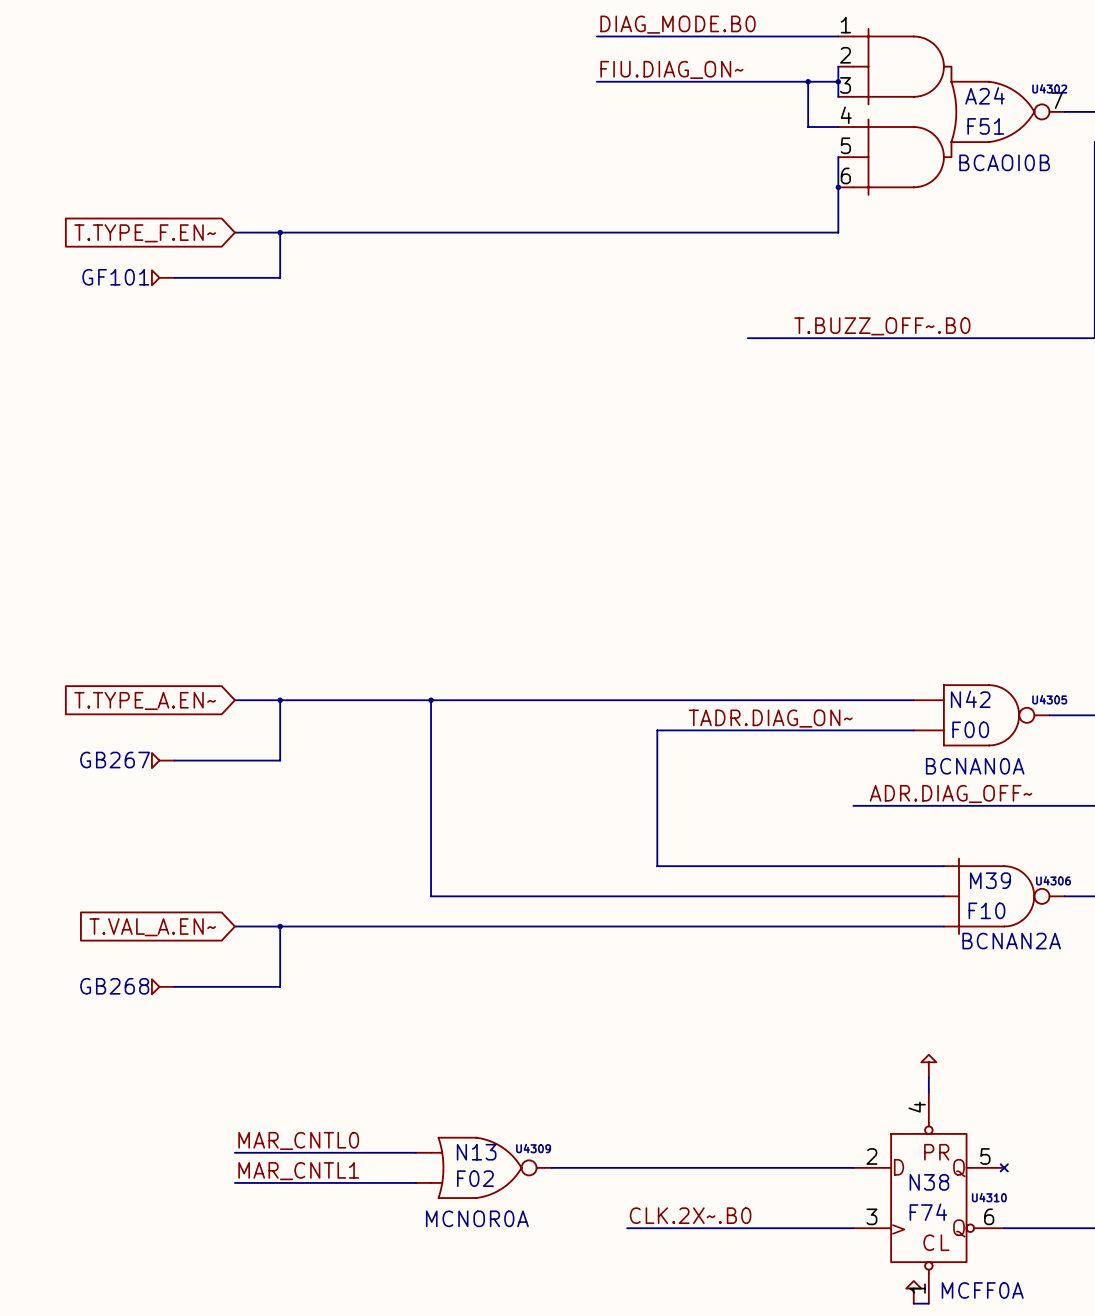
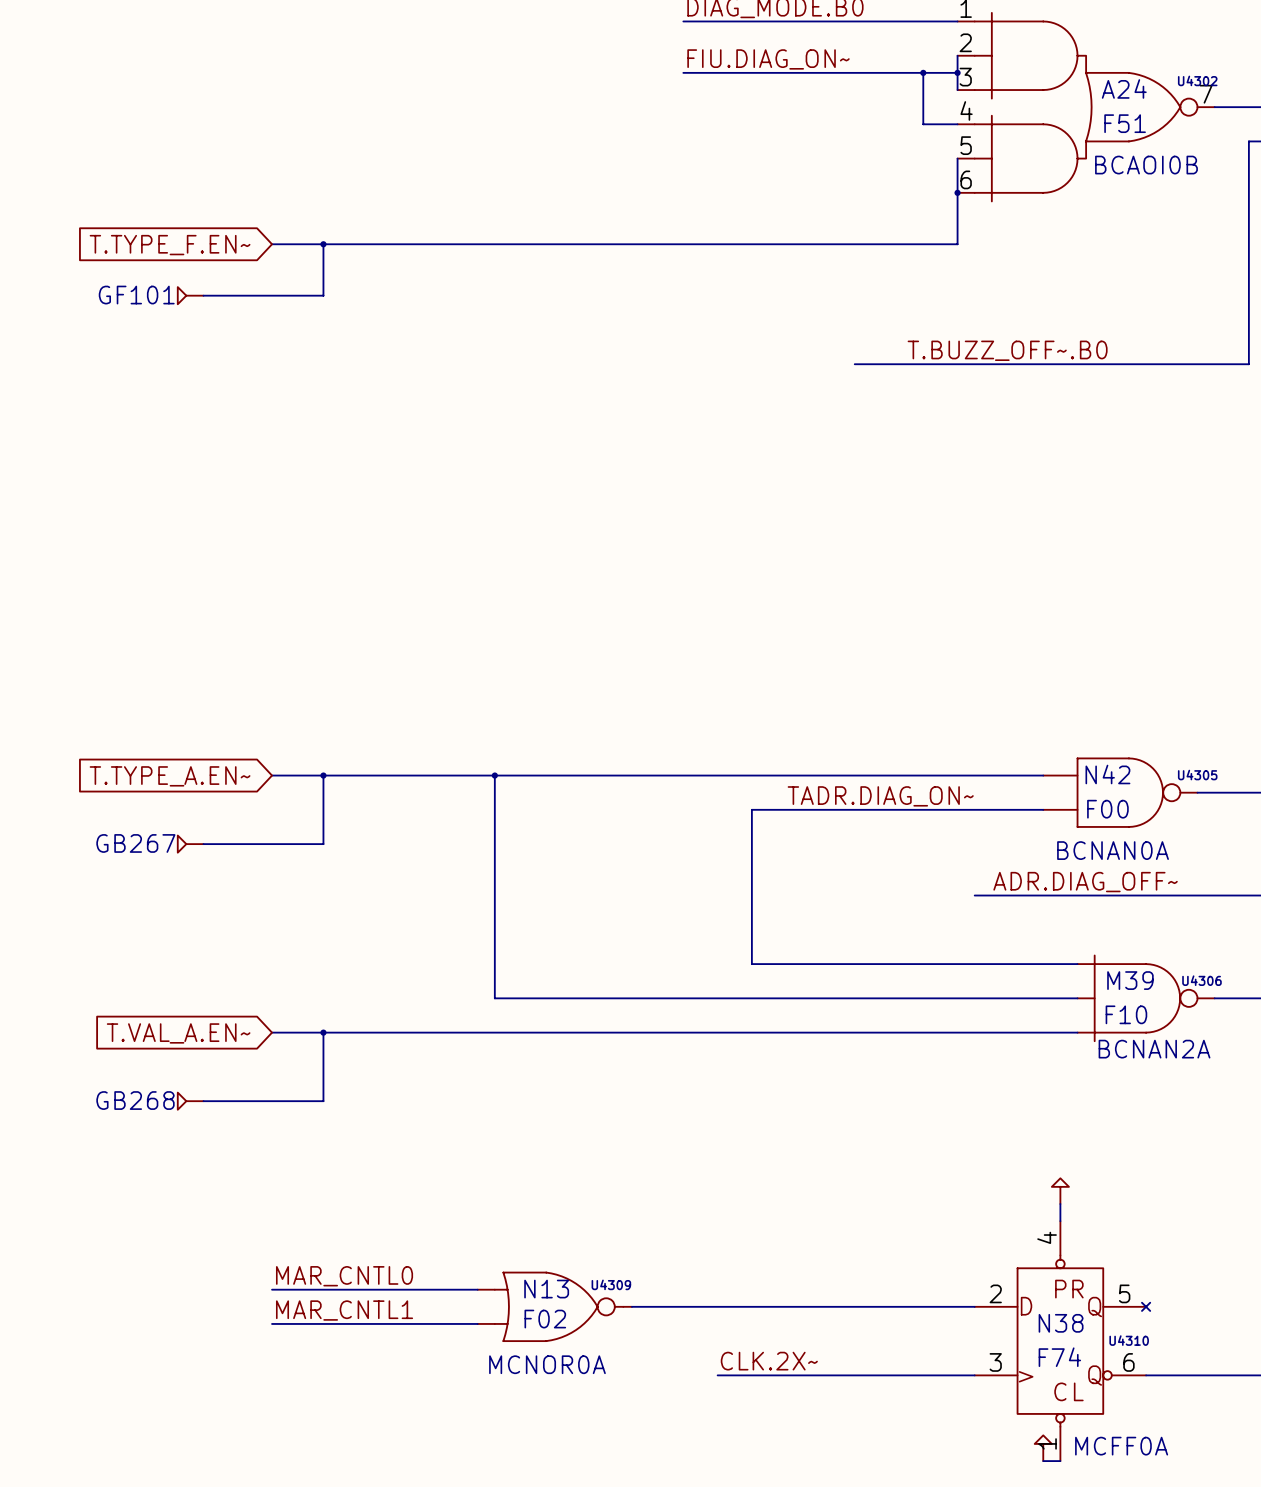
label: CLK.2X~.B0 (690, 1215) -> CLK.2X~ (769, 1361)

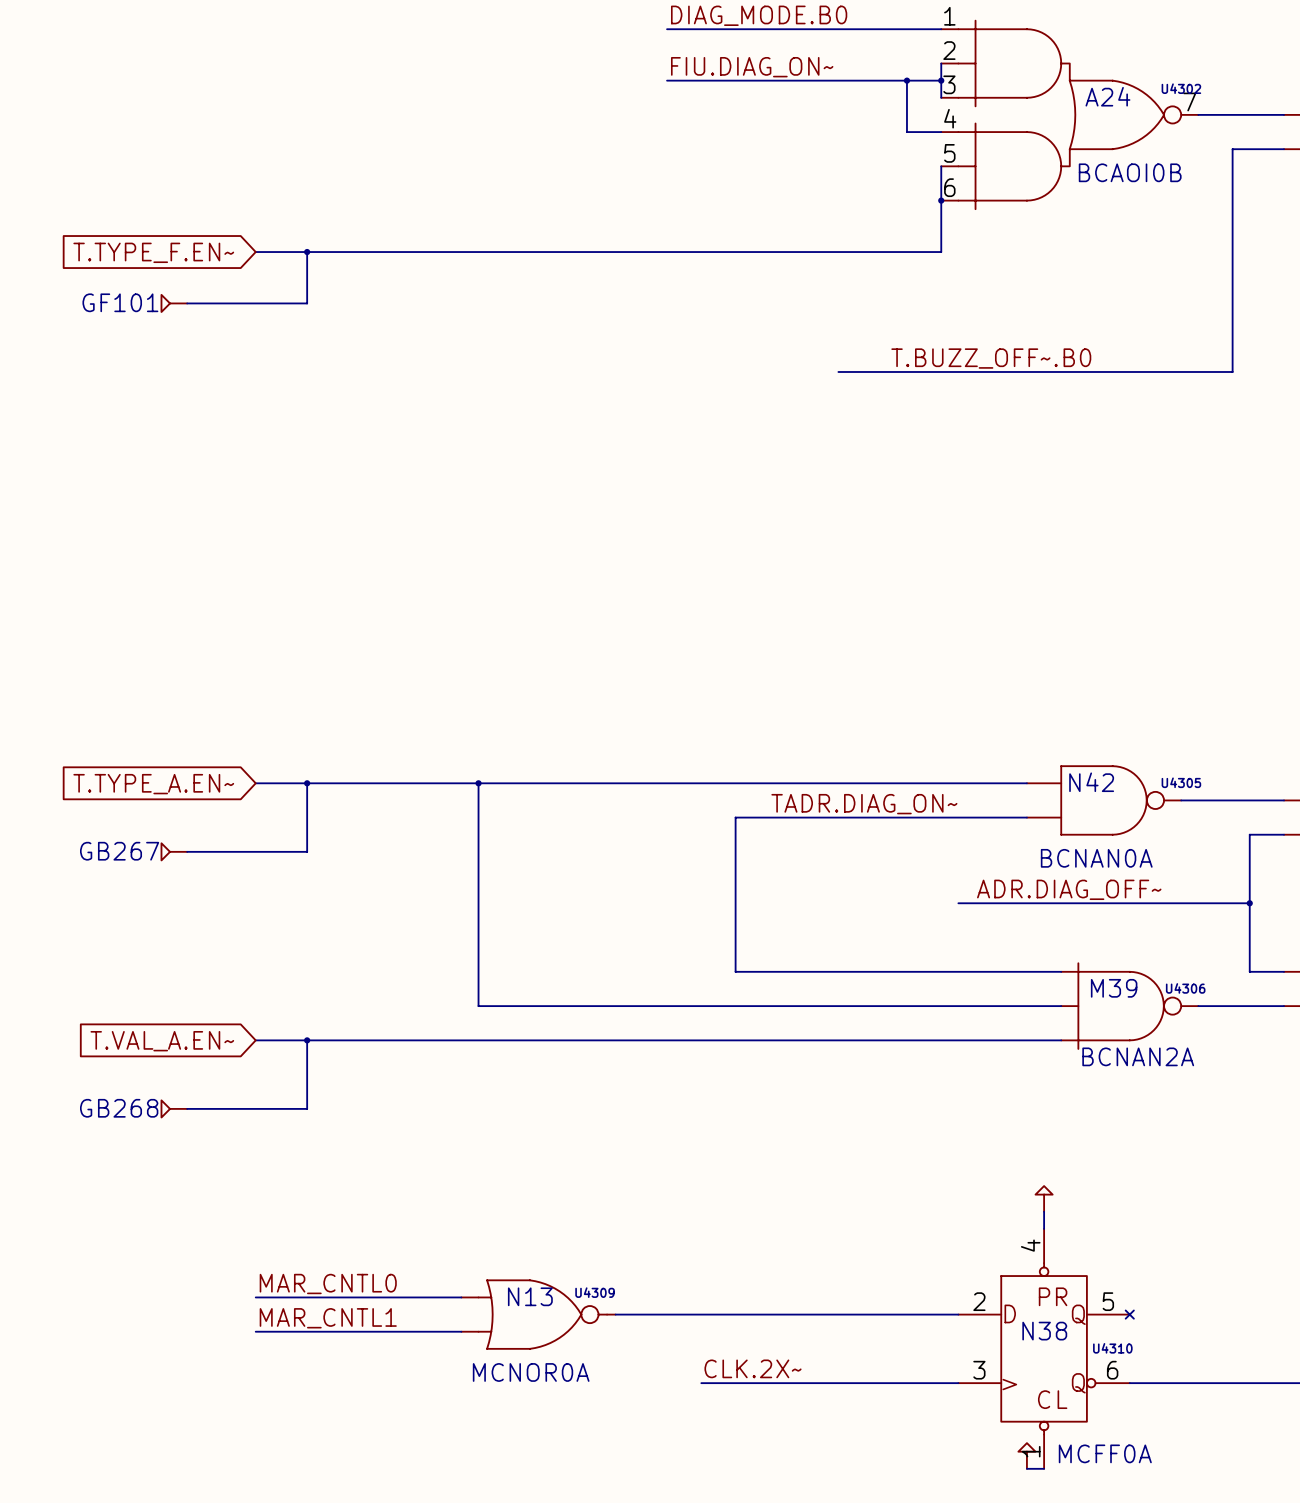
U4302 value: F51 (1125, 123) -> none
U4305 value: F00 (1107, 809) -> none
U4306 value: F10 (1126, 1014) -> none
U4309 value: F02 (545, 1319) -> none
U4310 value: F74 (1059, 1357) -> none

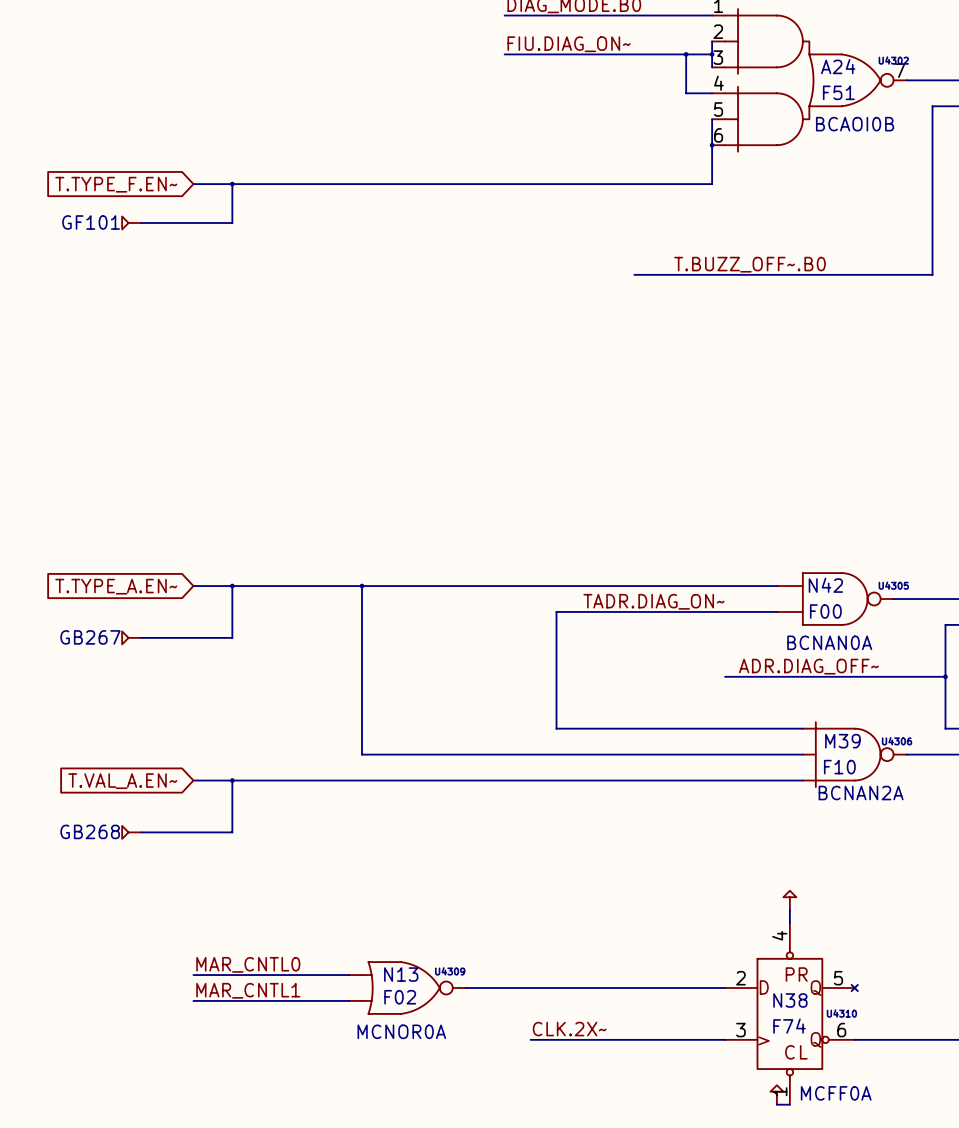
U4302 value: none -> F51 (838, 92)
U4305 value: none -> F00 (825, 611)
U4306 value: none -> F10 (839, 767)
U4309 value: none -> F02 (400, 997)
U4310 value: none -> F74 (789, 1026)

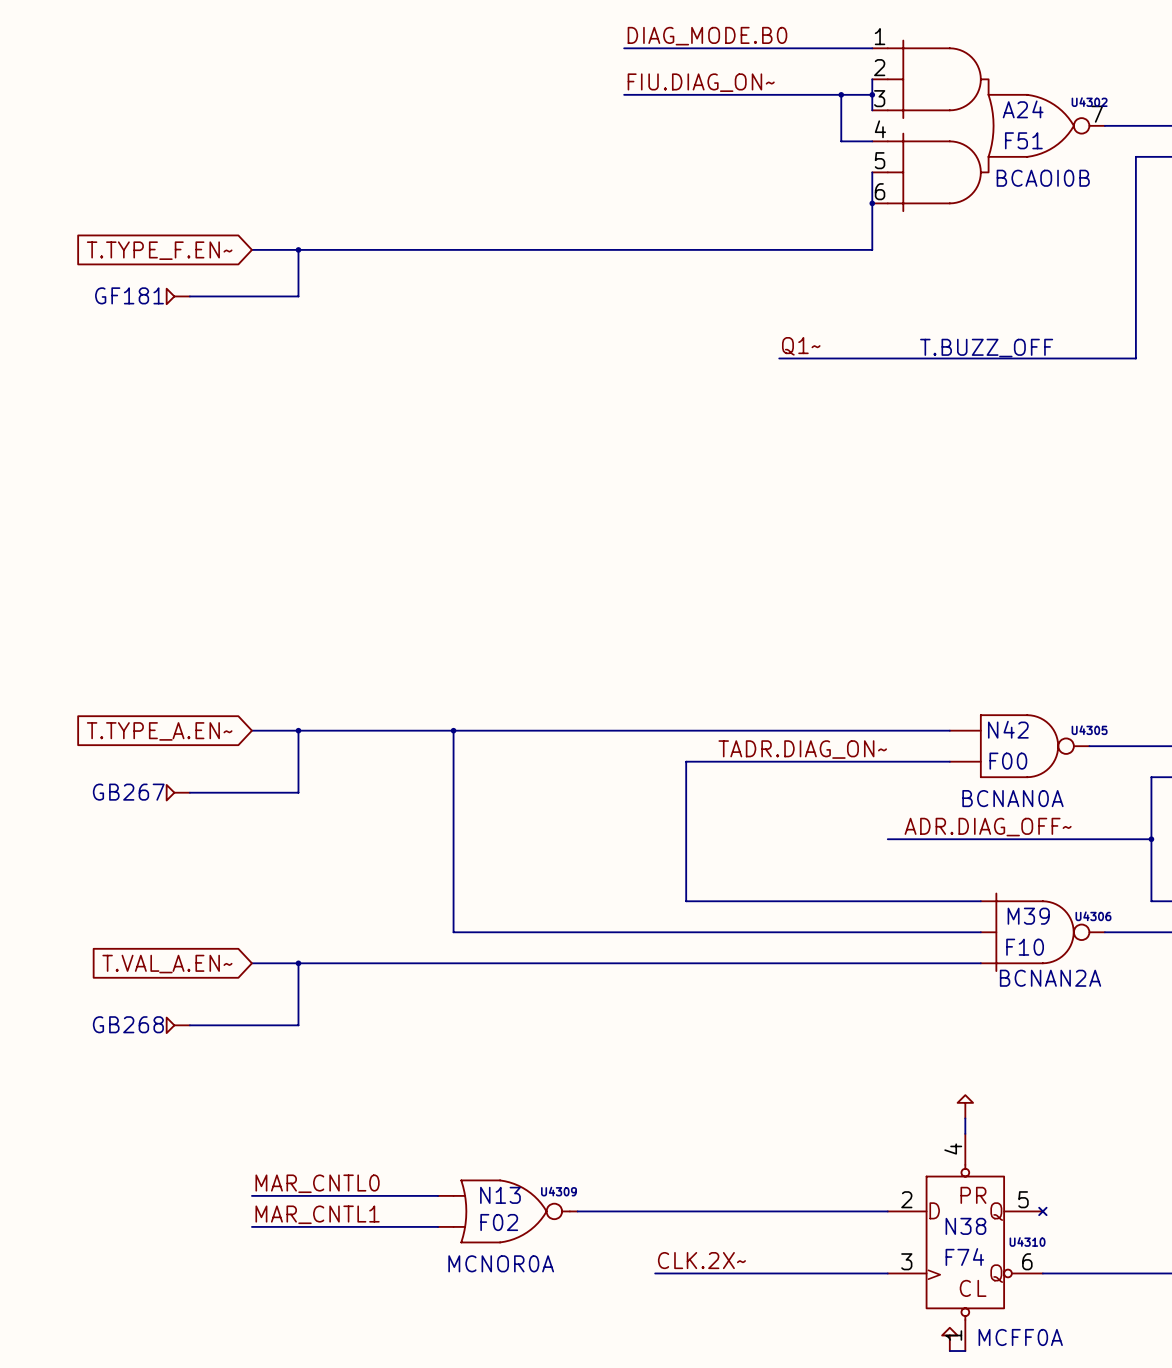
GF101 name: GF101 (91, 222) -> GF181 (129, 295)
label: none -> Q1~ (801, 346)
label: T.BUZZ_OFF~.B0 (749, 264) -> none
text: none -> T.BUZZ_OFF (986, 348)

